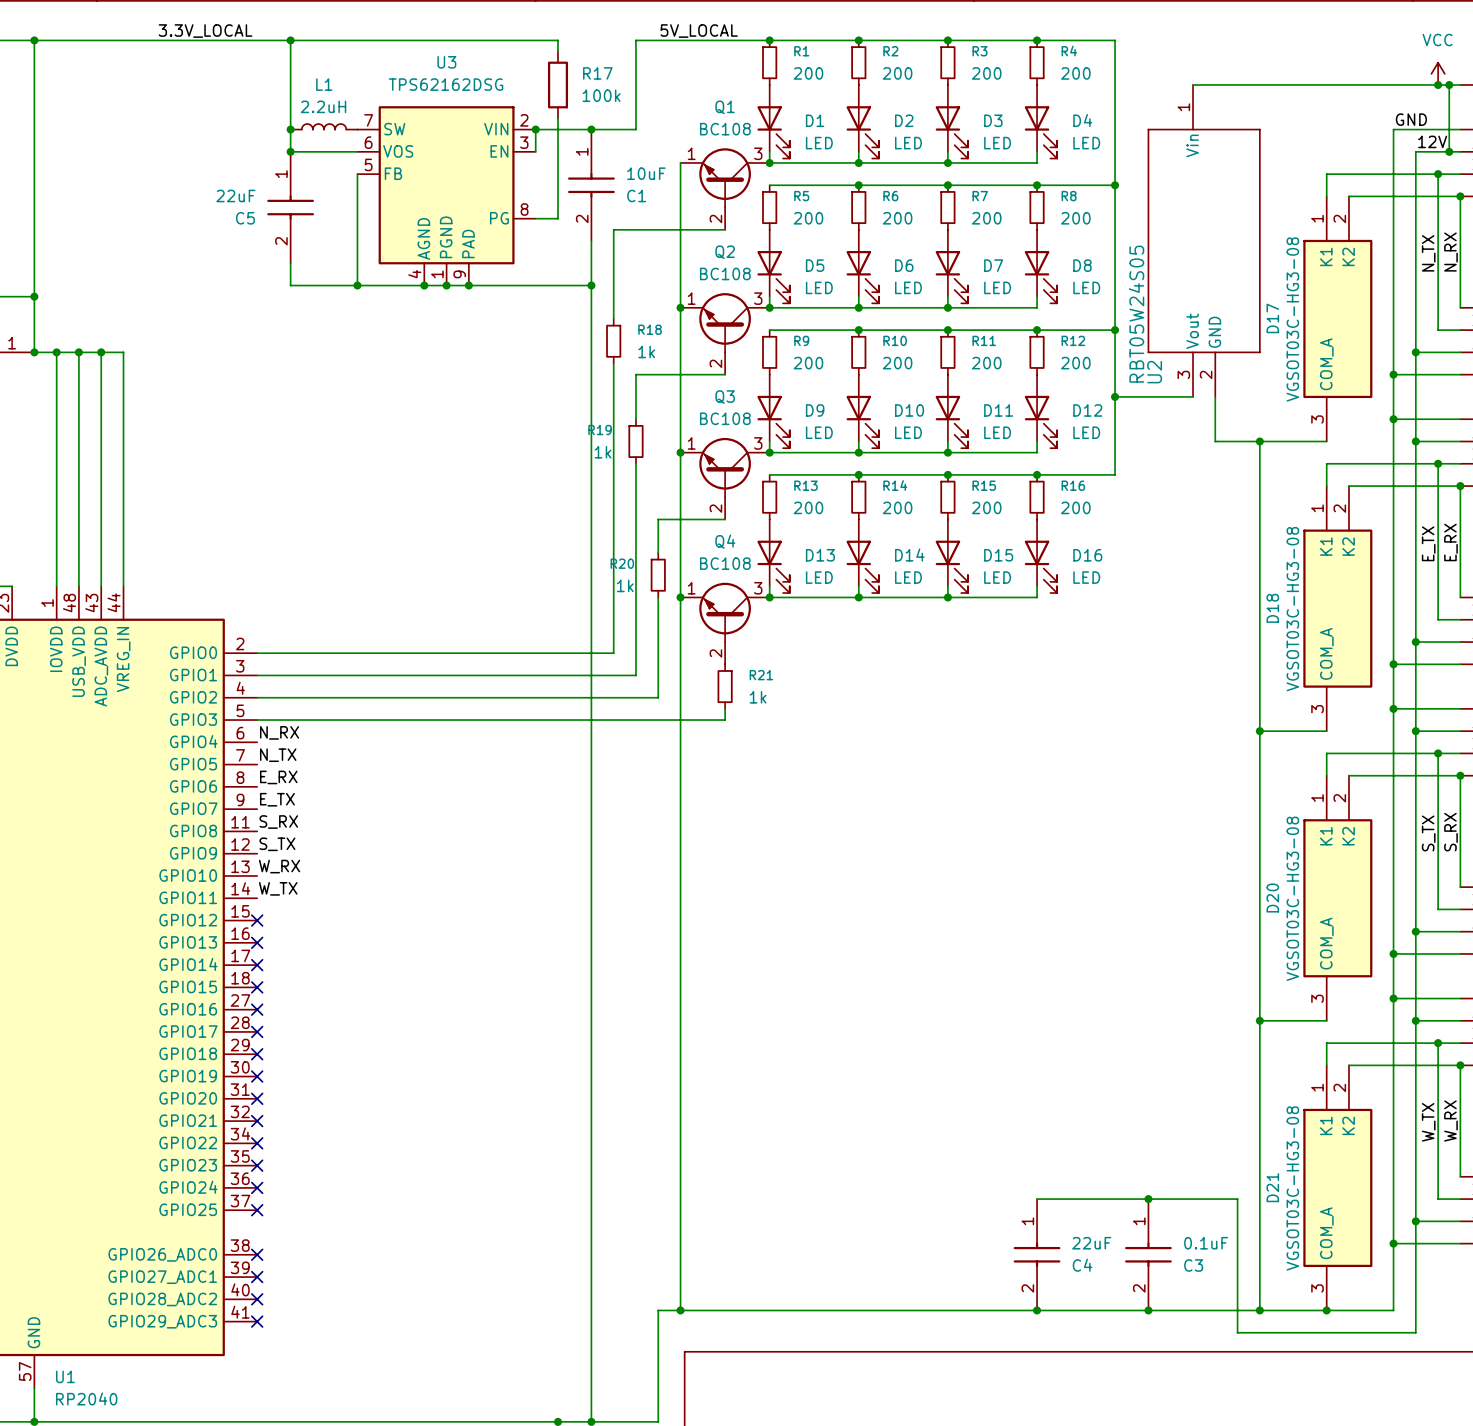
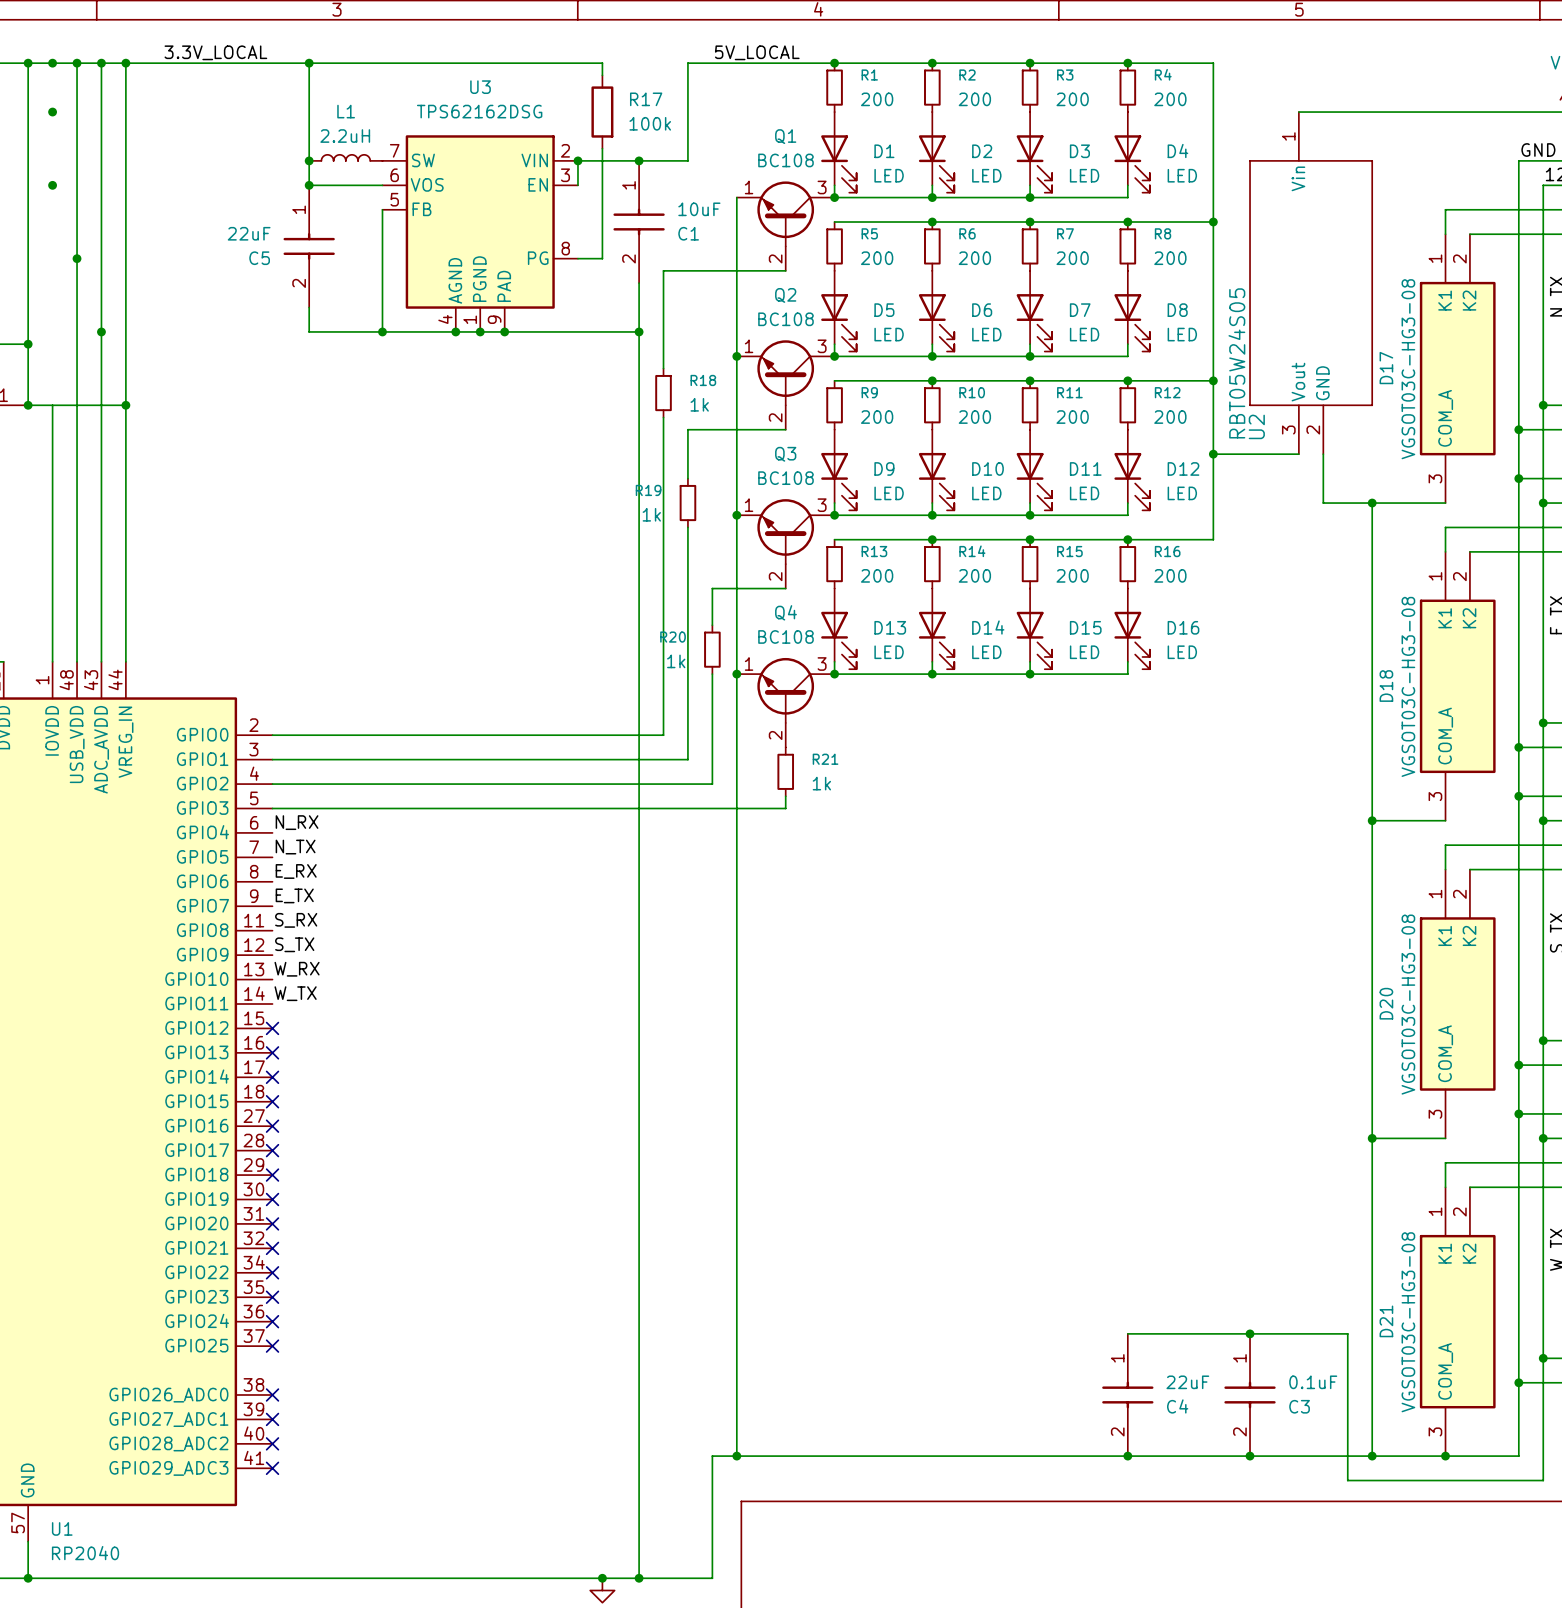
junction: none -> (52, 63)
wire: none -> (77, 63) (77, 405)
junction: none -> (77, 63)
wire: none -> (101, 63) (101, 405)
junction: none -> (101, 63)
wire: none -> (125, 63) (125, 405)
junction: none -> (125, 63)
junction: none -> (52, 112)
junction: none -> (52, 185)
junction: none -> (77, 258)
junction: none -> (101, 331)
junction: (56, 352) -> none
junction: (78, 352) -> none
junction: (101, 352) -> none
junction: none -> (125, 405)

